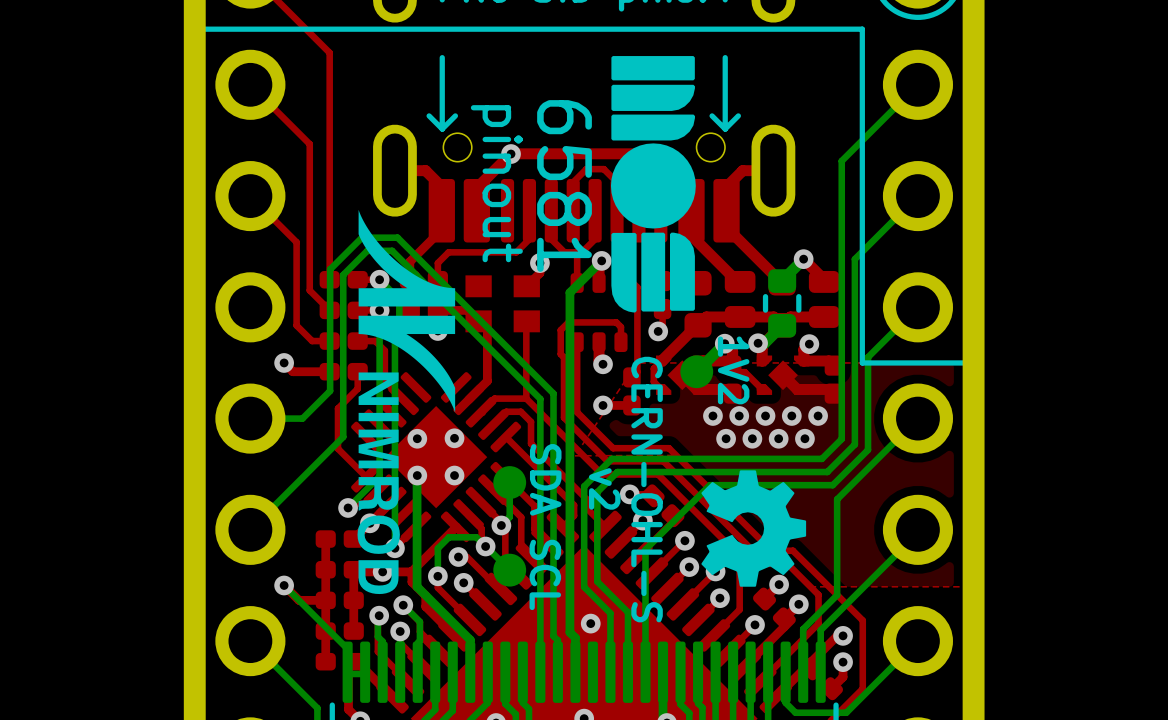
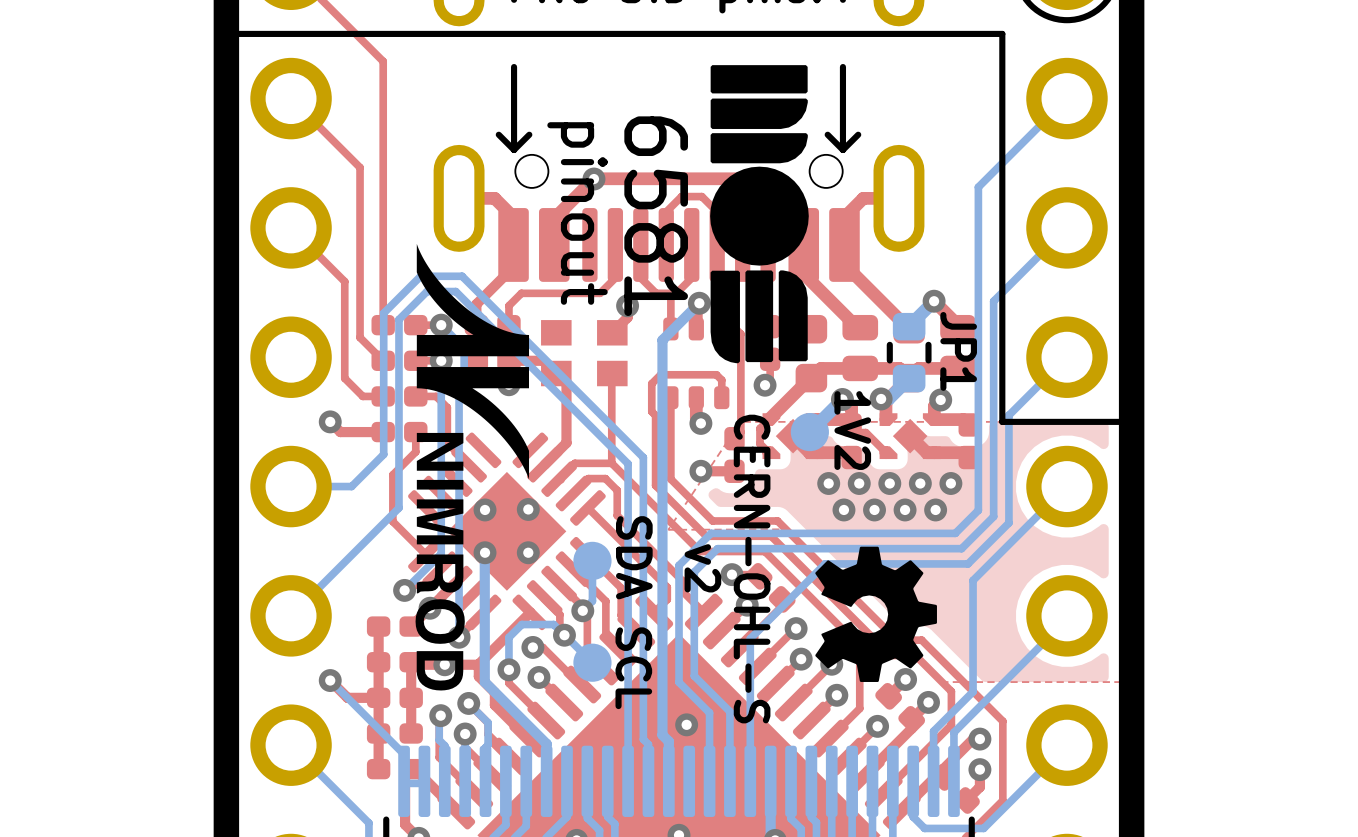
JP1 name: none -> JP1 (958, 351)

